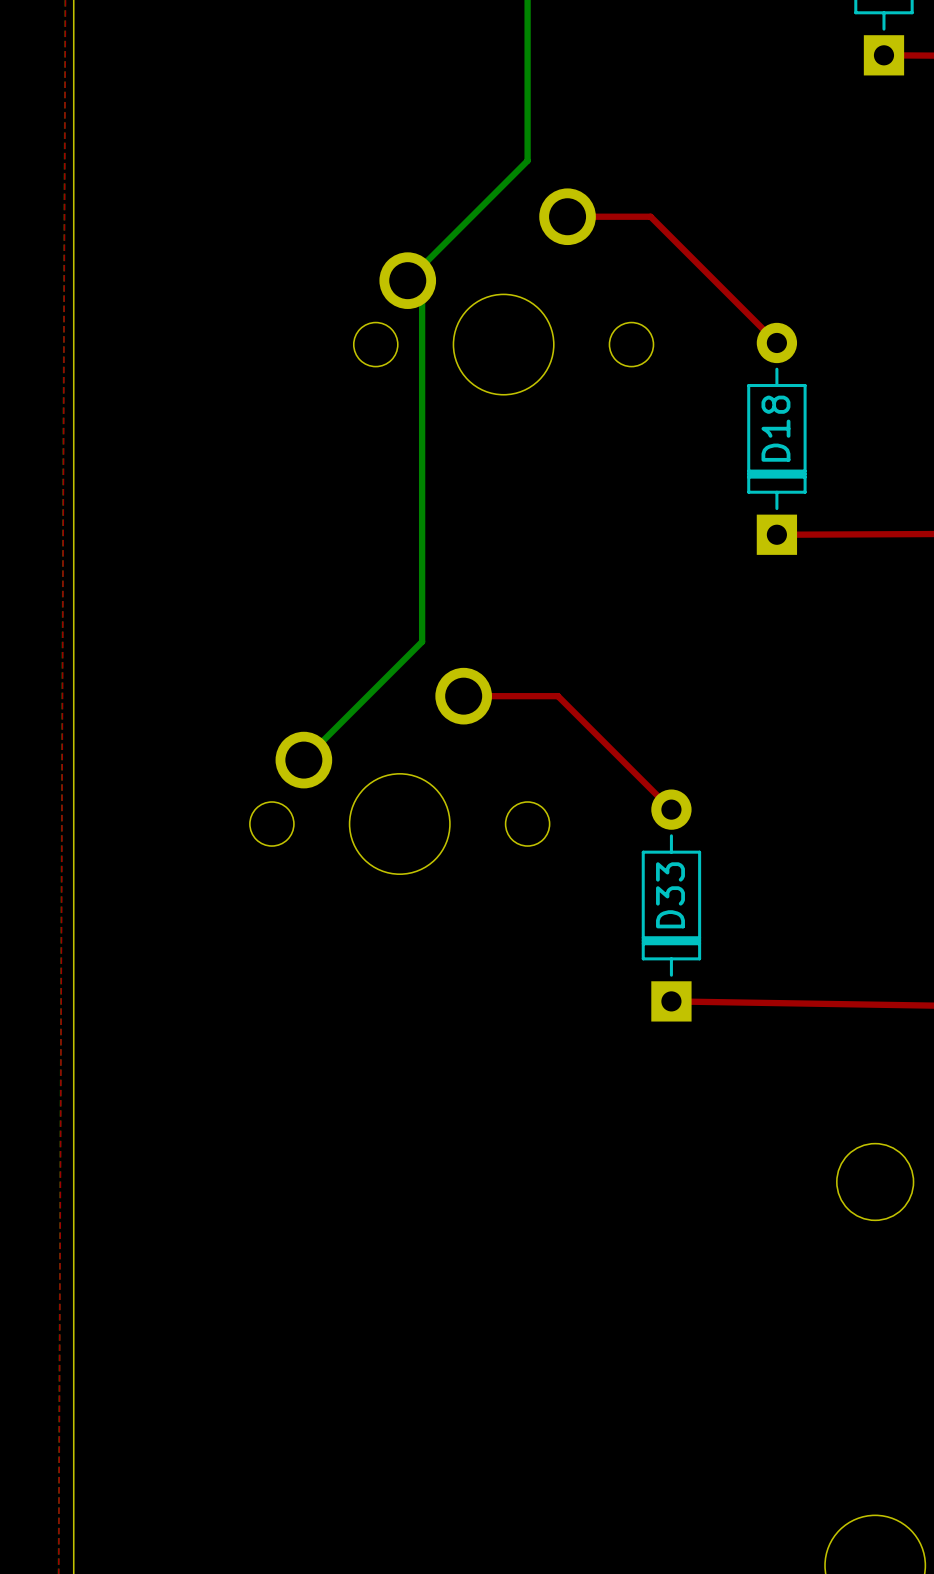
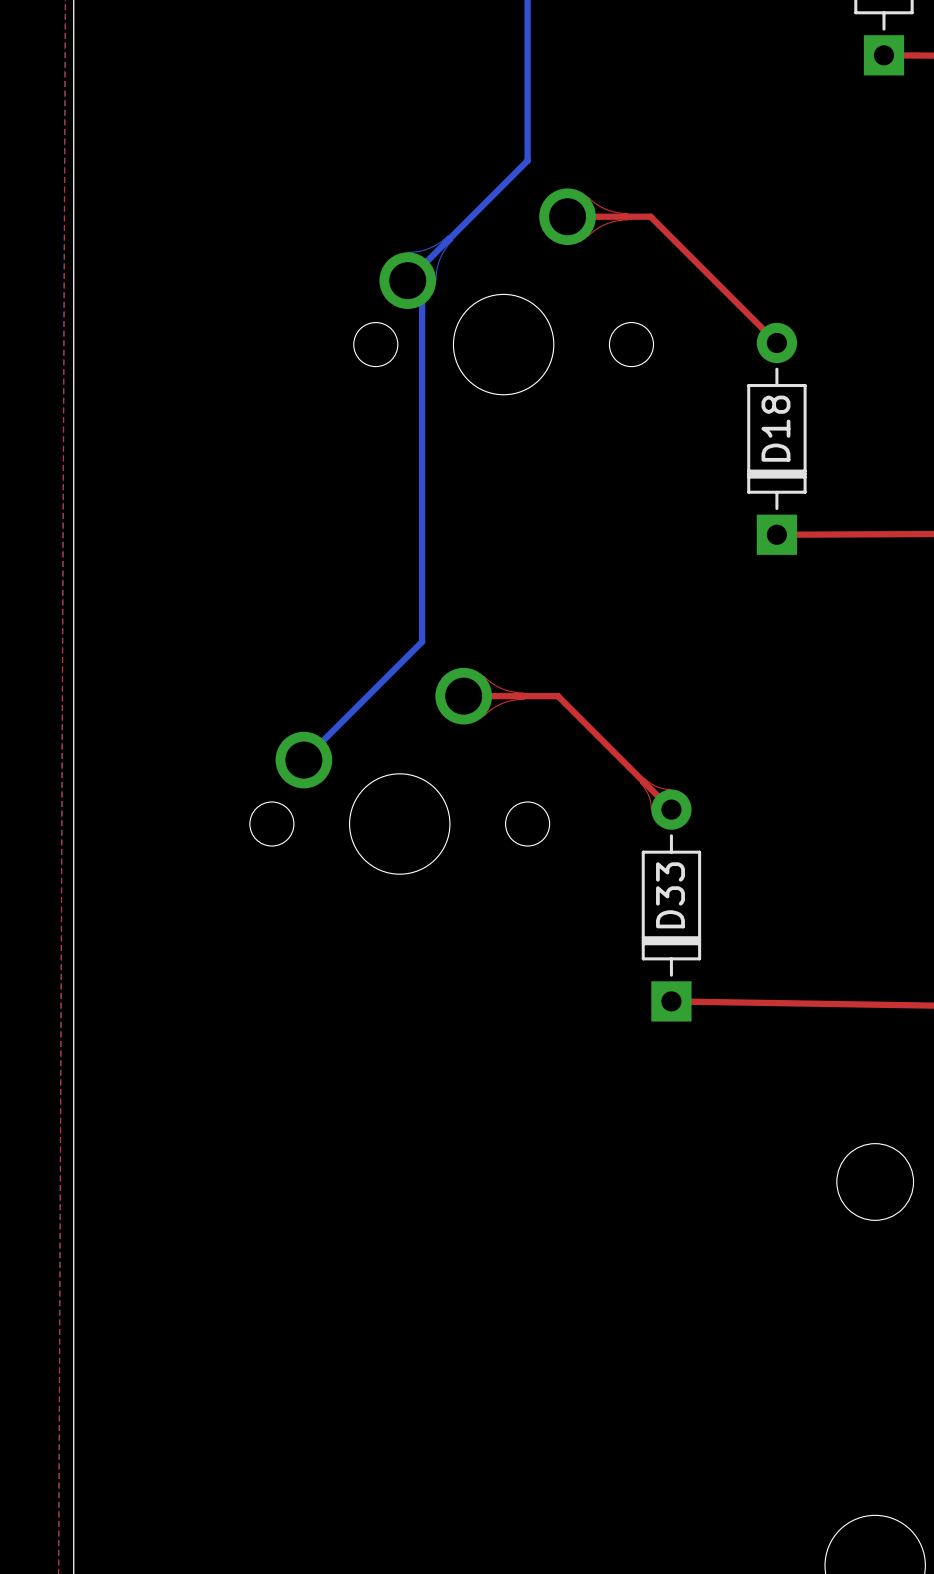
top zone outline: none -> (587, 196) (606, 209) (628, 213) (628, 219) (606, 224) (587, 236) (553, 216) (587, 196)
bottom zone outline: none -> (448, 235) (429, 248) (408, 252) (397, 290) (436, 280) (440, 258) (452, 239) (448, 235)
top zone outline: none -> (483, 676) (502, 688) (524, 693) (524, 699) (502, 703) (483, 715) (449, 696) (483, 676)
top zone outline: none -> (644, 778) (656, 786) (671, 789) (678, 816) (651, 809) (648, 795) (640, 782) (644, 778)

